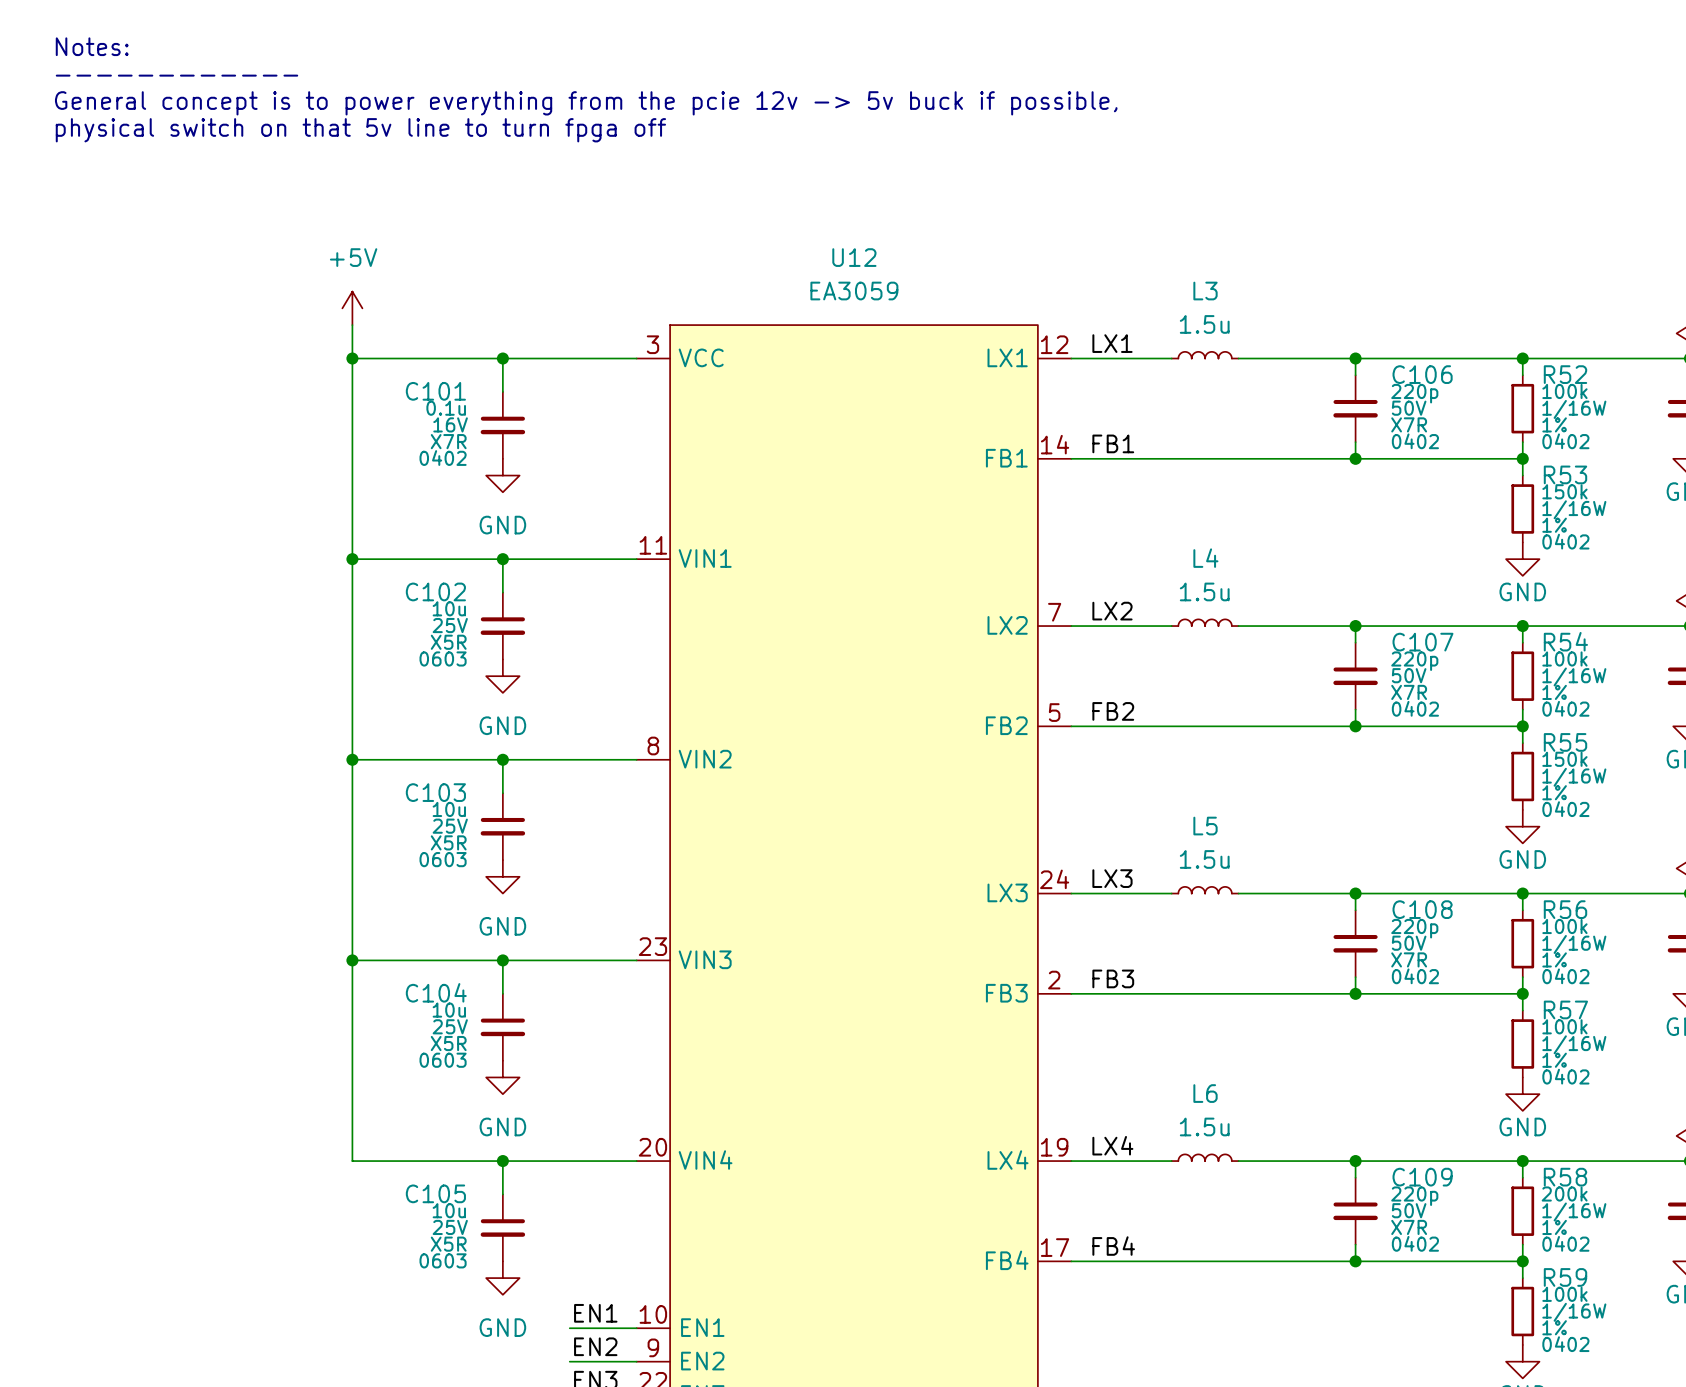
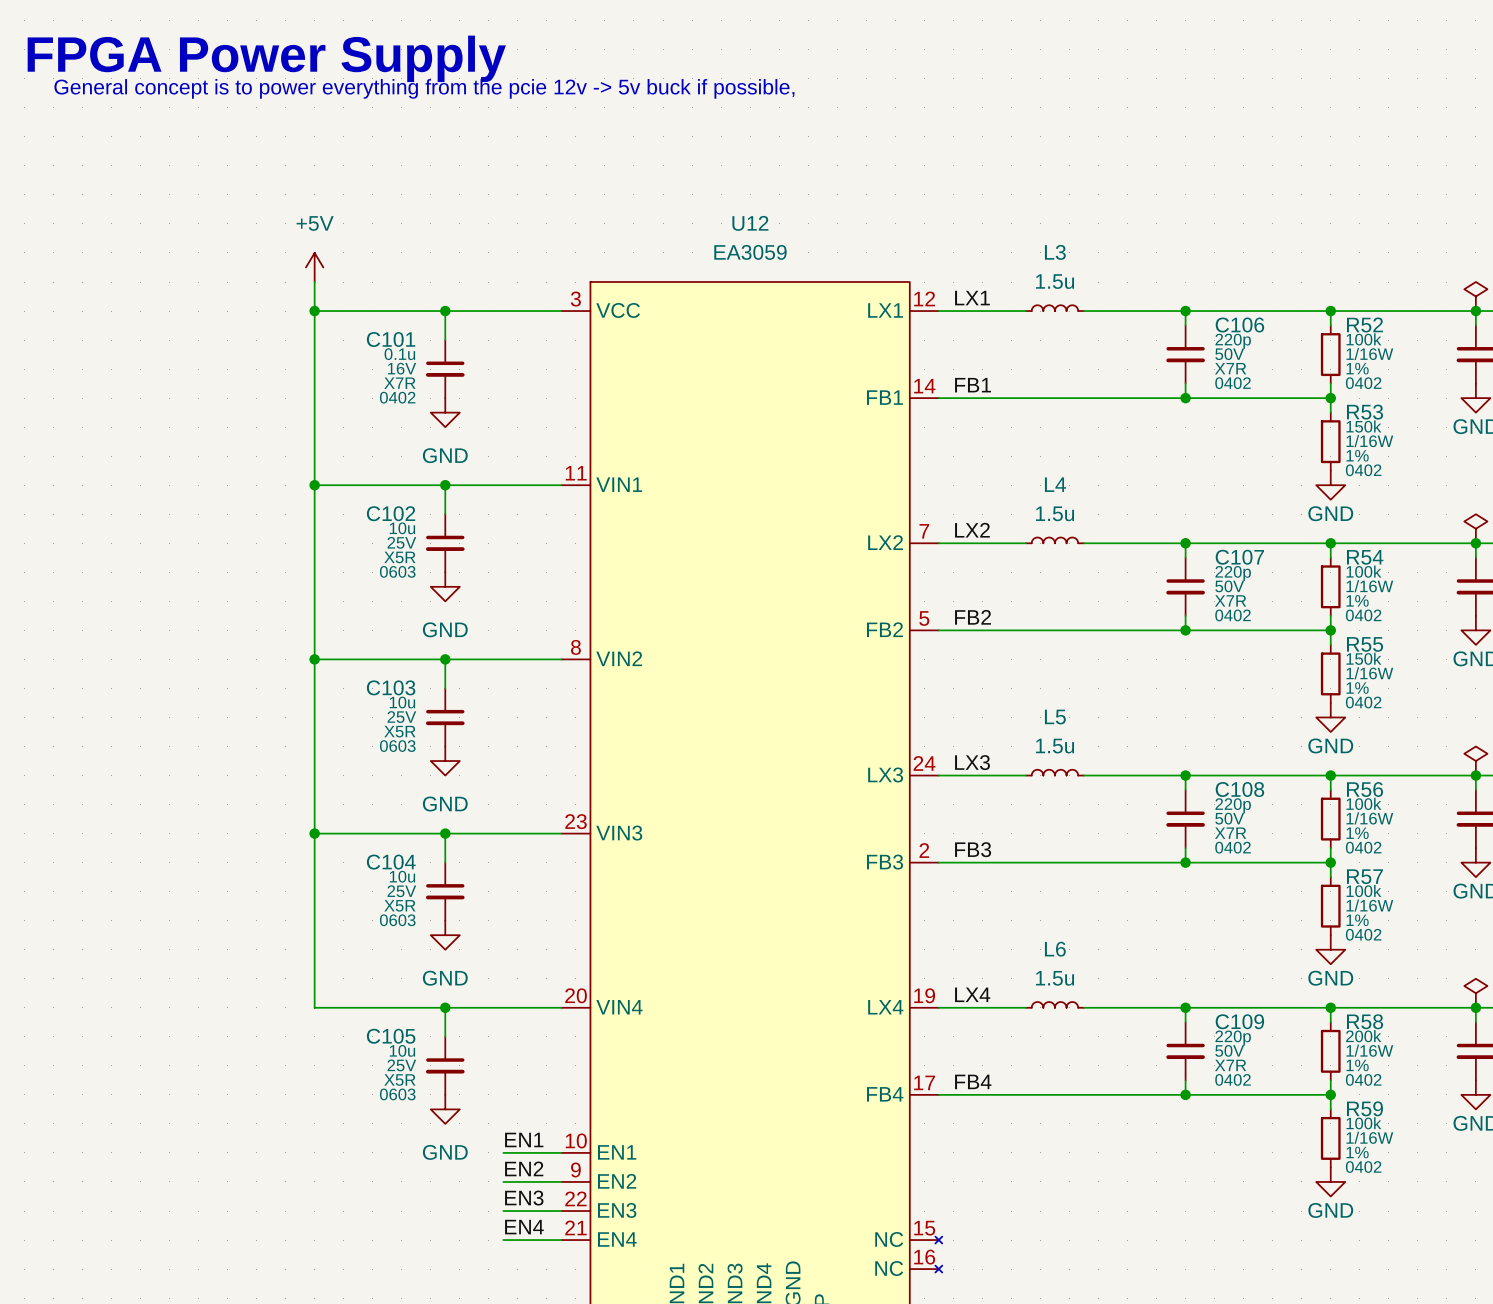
text: Notes: (92, 46) -> none
text: none -> FPGA Power Supply (266, 58)
text: ------------ (176, 75) -> none
text: physical switch on that 5v line to turn fpga off (360, 130) -> none

